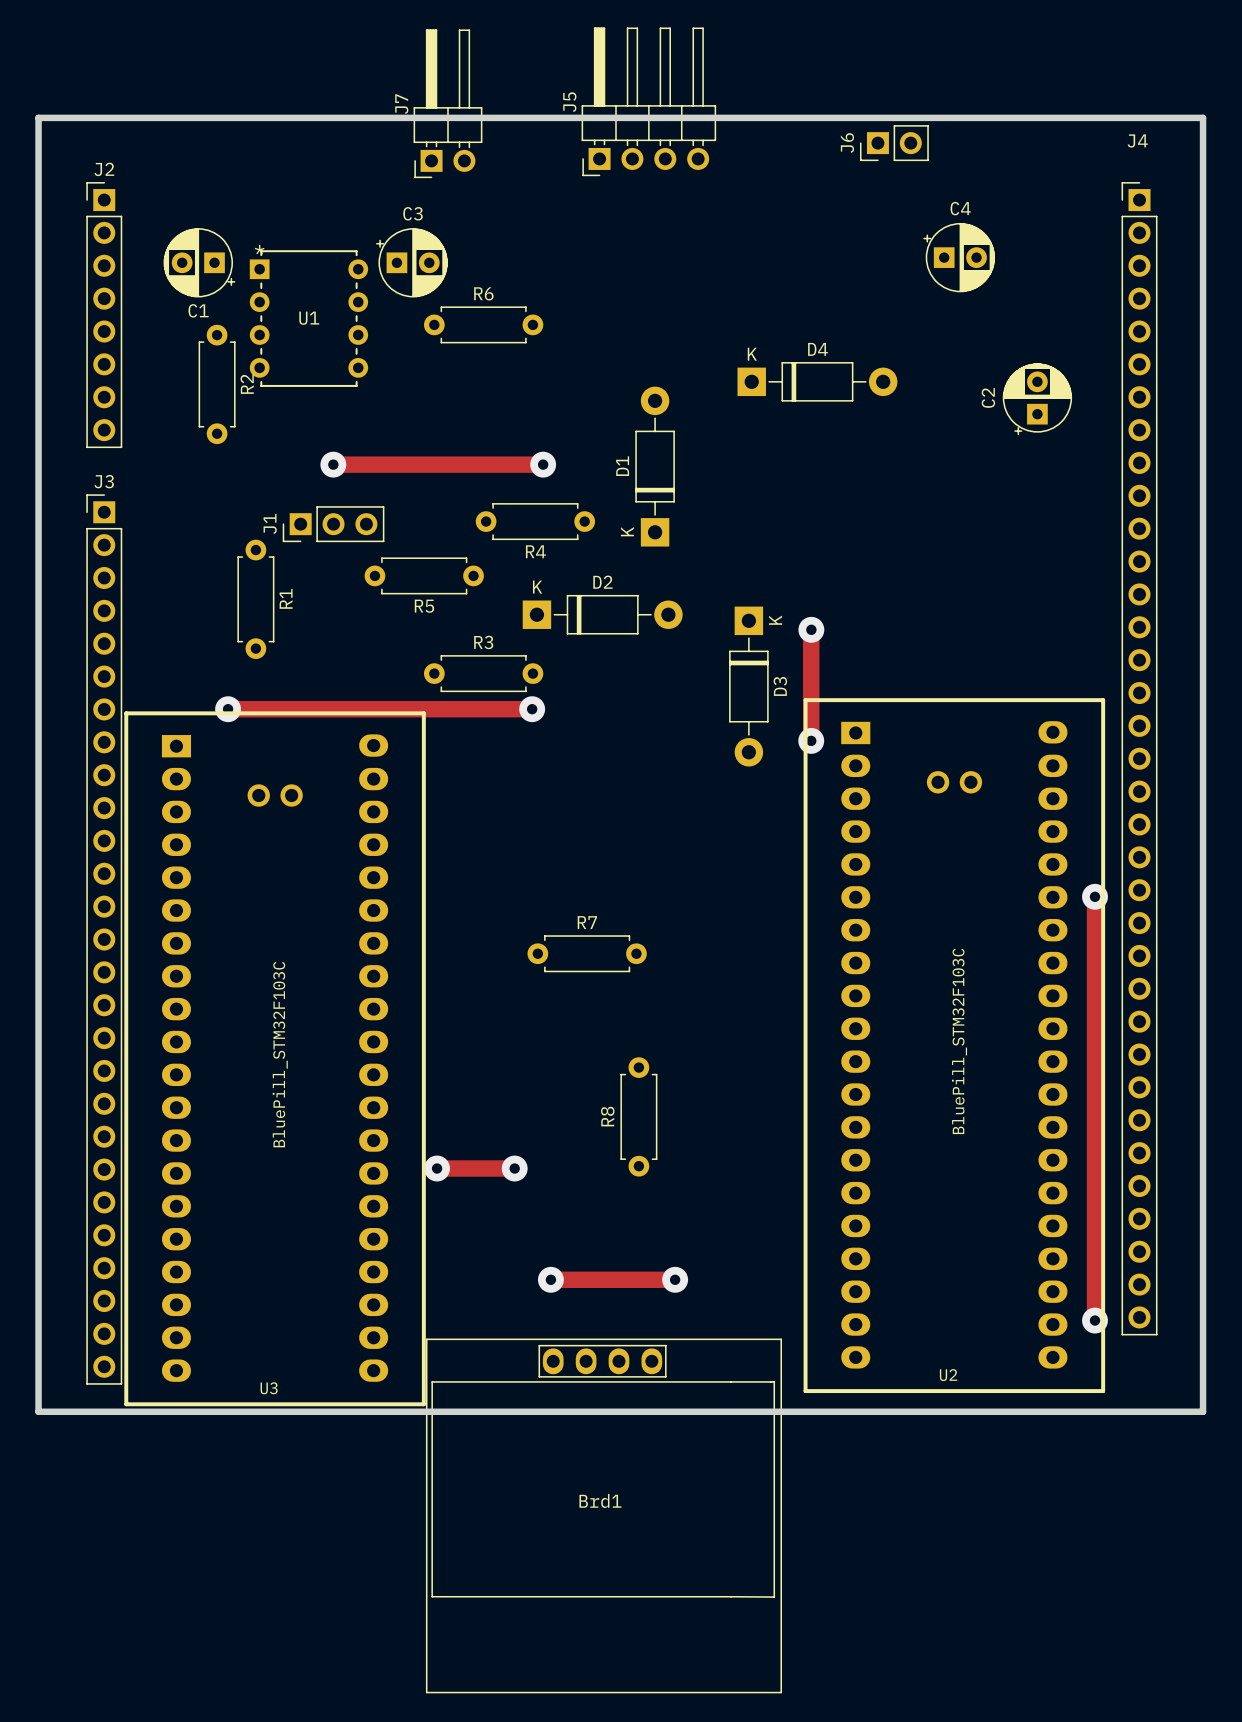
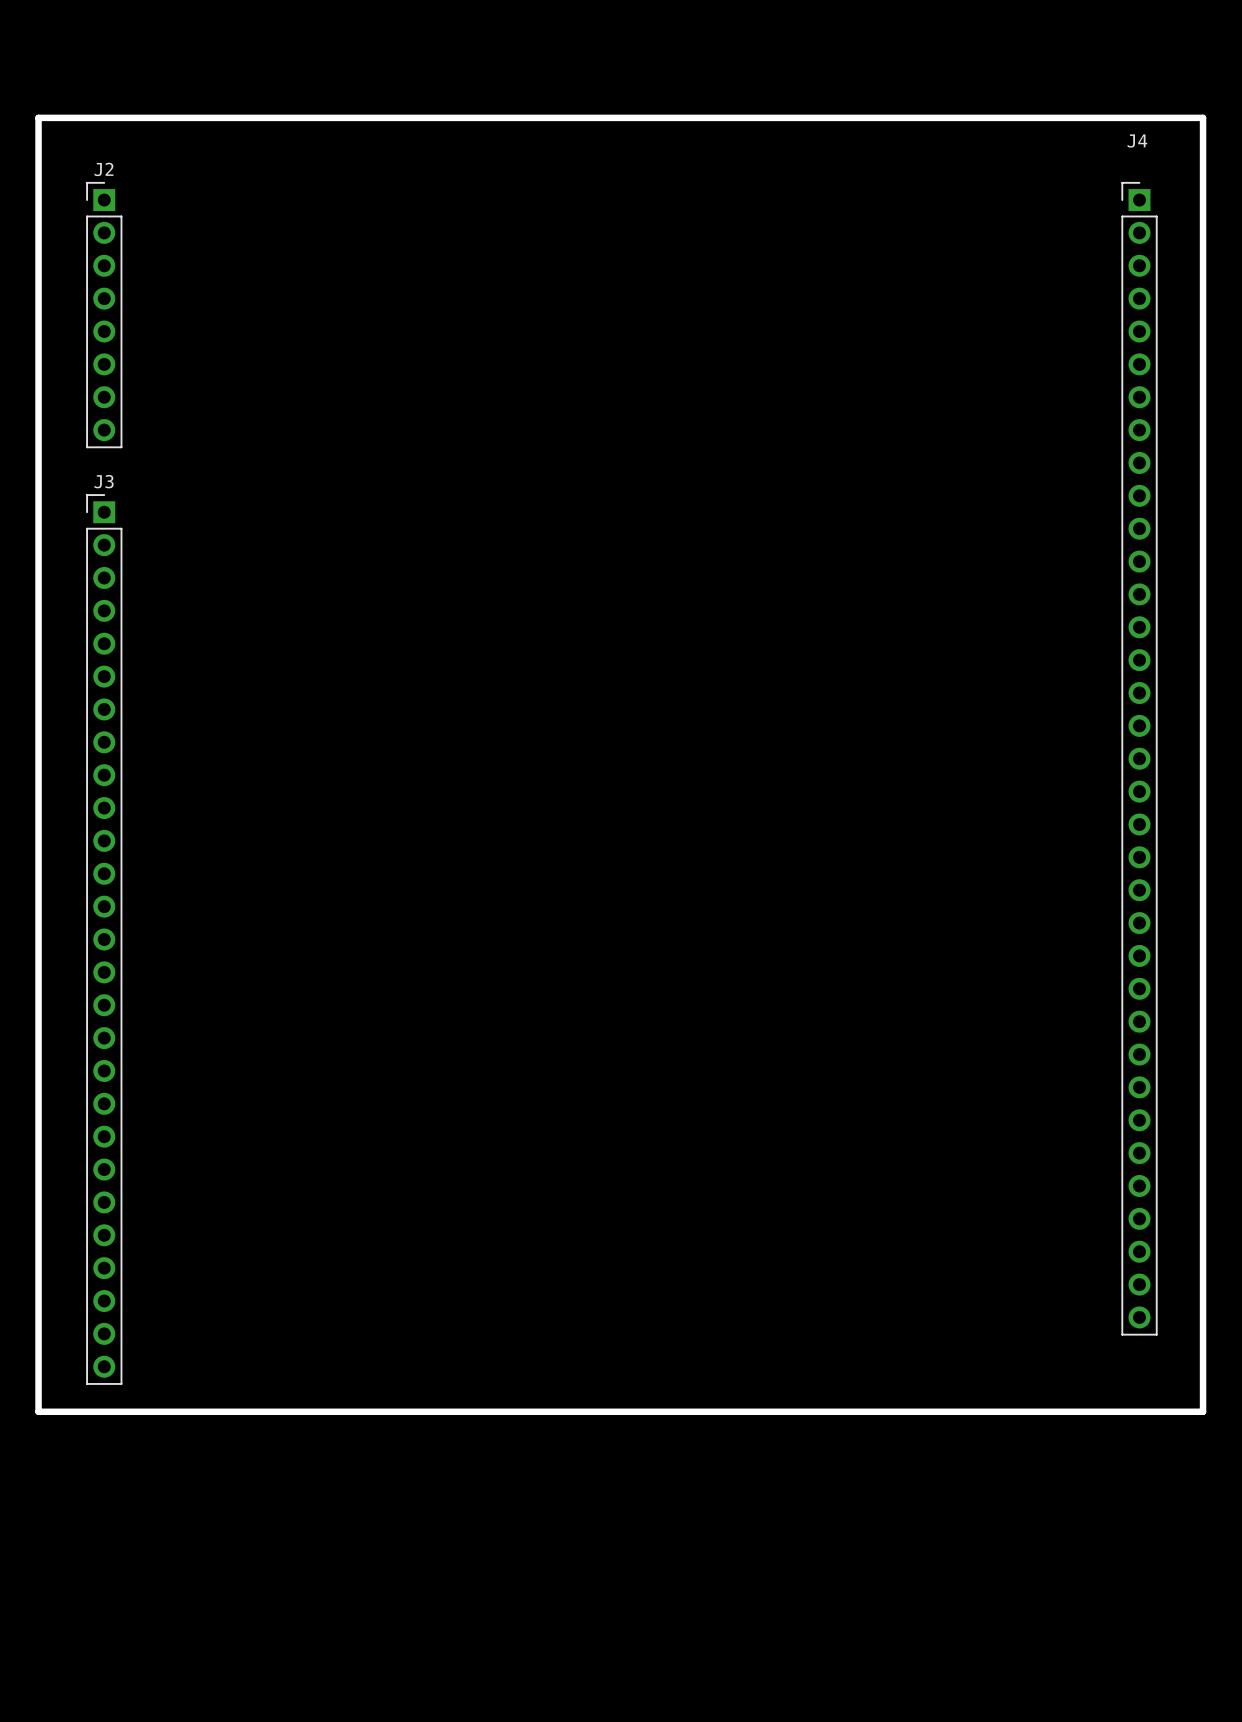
J5: (648, 101) -> none
J7: (447, 103) -> none
J6: (894, 143) -> none
C4: (959, 257) -> none
C1: (199, 262) -> none
C3: (411, 262) -> none
U1: (308, 318) -> none
R6: (483, 324) -> none
D4: (817, 381) -> none
R2: (217, 384) -> none
C2: (1037, 399) -> none
track: (333, 464) (543, 464) -> none
via: (333, 464) -> none
via: (543, 464) -> none
D1: (655, 466) -> none
R4: (535, 521) -> none
J1: (333, 524) -> none
R5: (424, 575) -> none
R1: (255, 599) -> none
D2: (602, 614) -> none
track: (811, 629) (811, 740) -> none
via: (811, 629) -> none
R3: (483, 673) -> none
D3: (748, 686) -> none
track: (228, 709) (532, 709) -> none
via: (228, 709) -> none
via: (532, 709) -> none
via: (811, 740) -> none
track: (1095, 896) (1095, 1320) -> none
via: (1095, 896) -> none
R7: (587, 953) -> none
U2: BluePill_STM32F103C (954, 1045) -> none
U3: BluePill_STM32F103C (275, 1058) -> none
R8: (638, 1116) -> none
track: (437, 1168) (514, 1168) -> none
via: (437, 1168) -> none
via: (514, 1168) -> none
track: (550, 1279) (675, 1279) -> none
via: (550, 1279) -> none
via: (675, 1279) -> none
via: (1095, 1320) -> none
Brd1: (603, 1515) -> none

